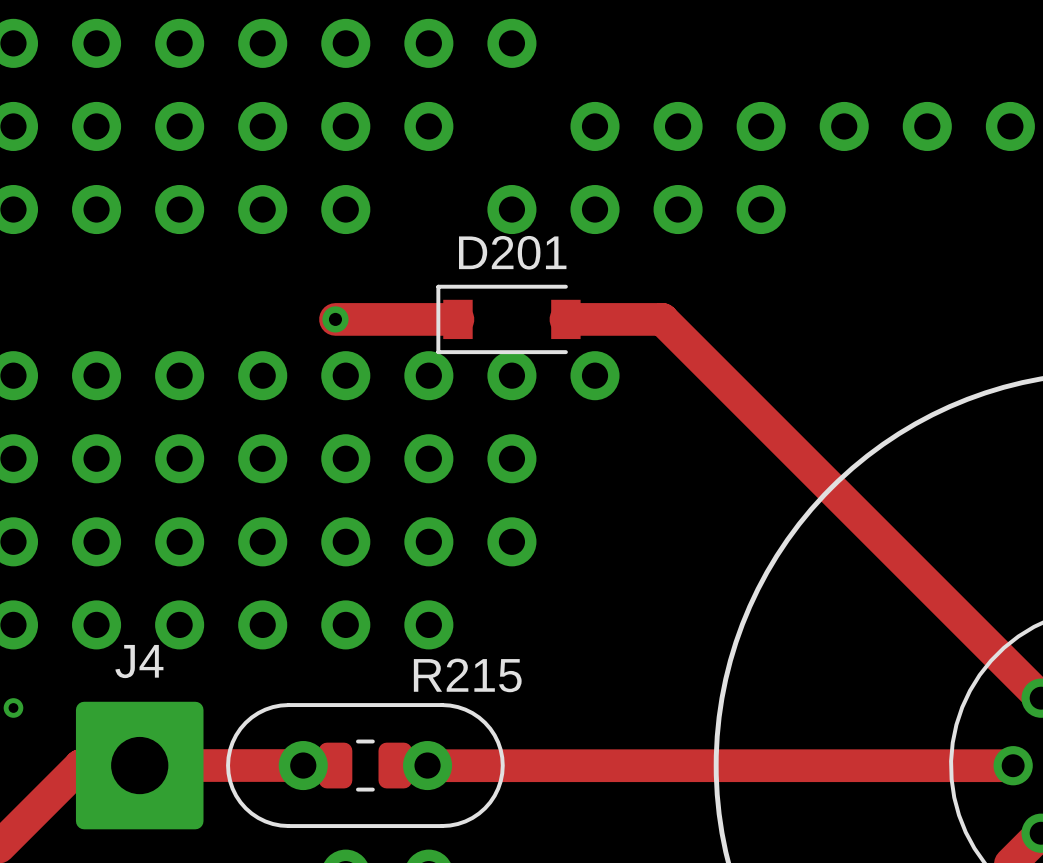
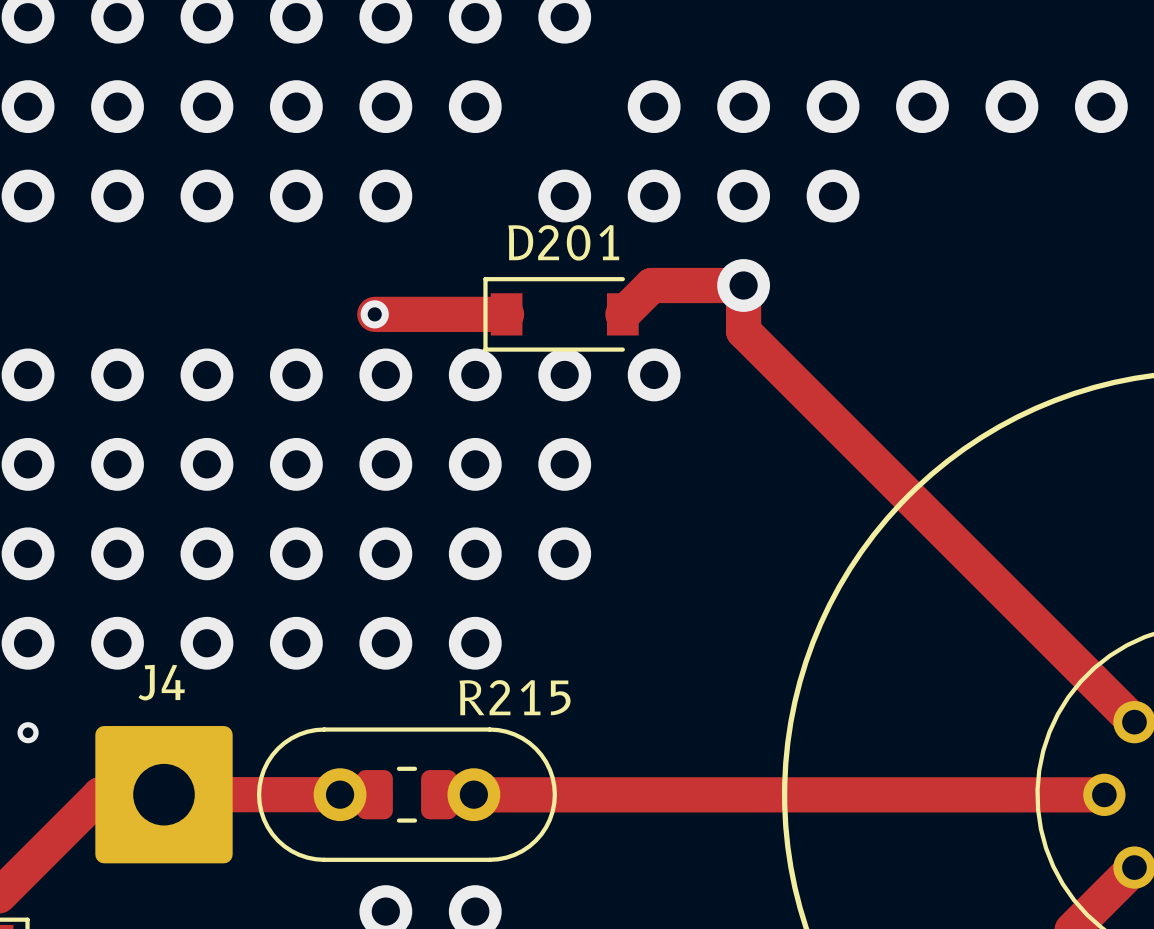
via: none -> (743, 285)
track: (565, 319) (662, 319) (678, 335) -> (622, 314) (651, 285) (743, 285) (743, 331)

